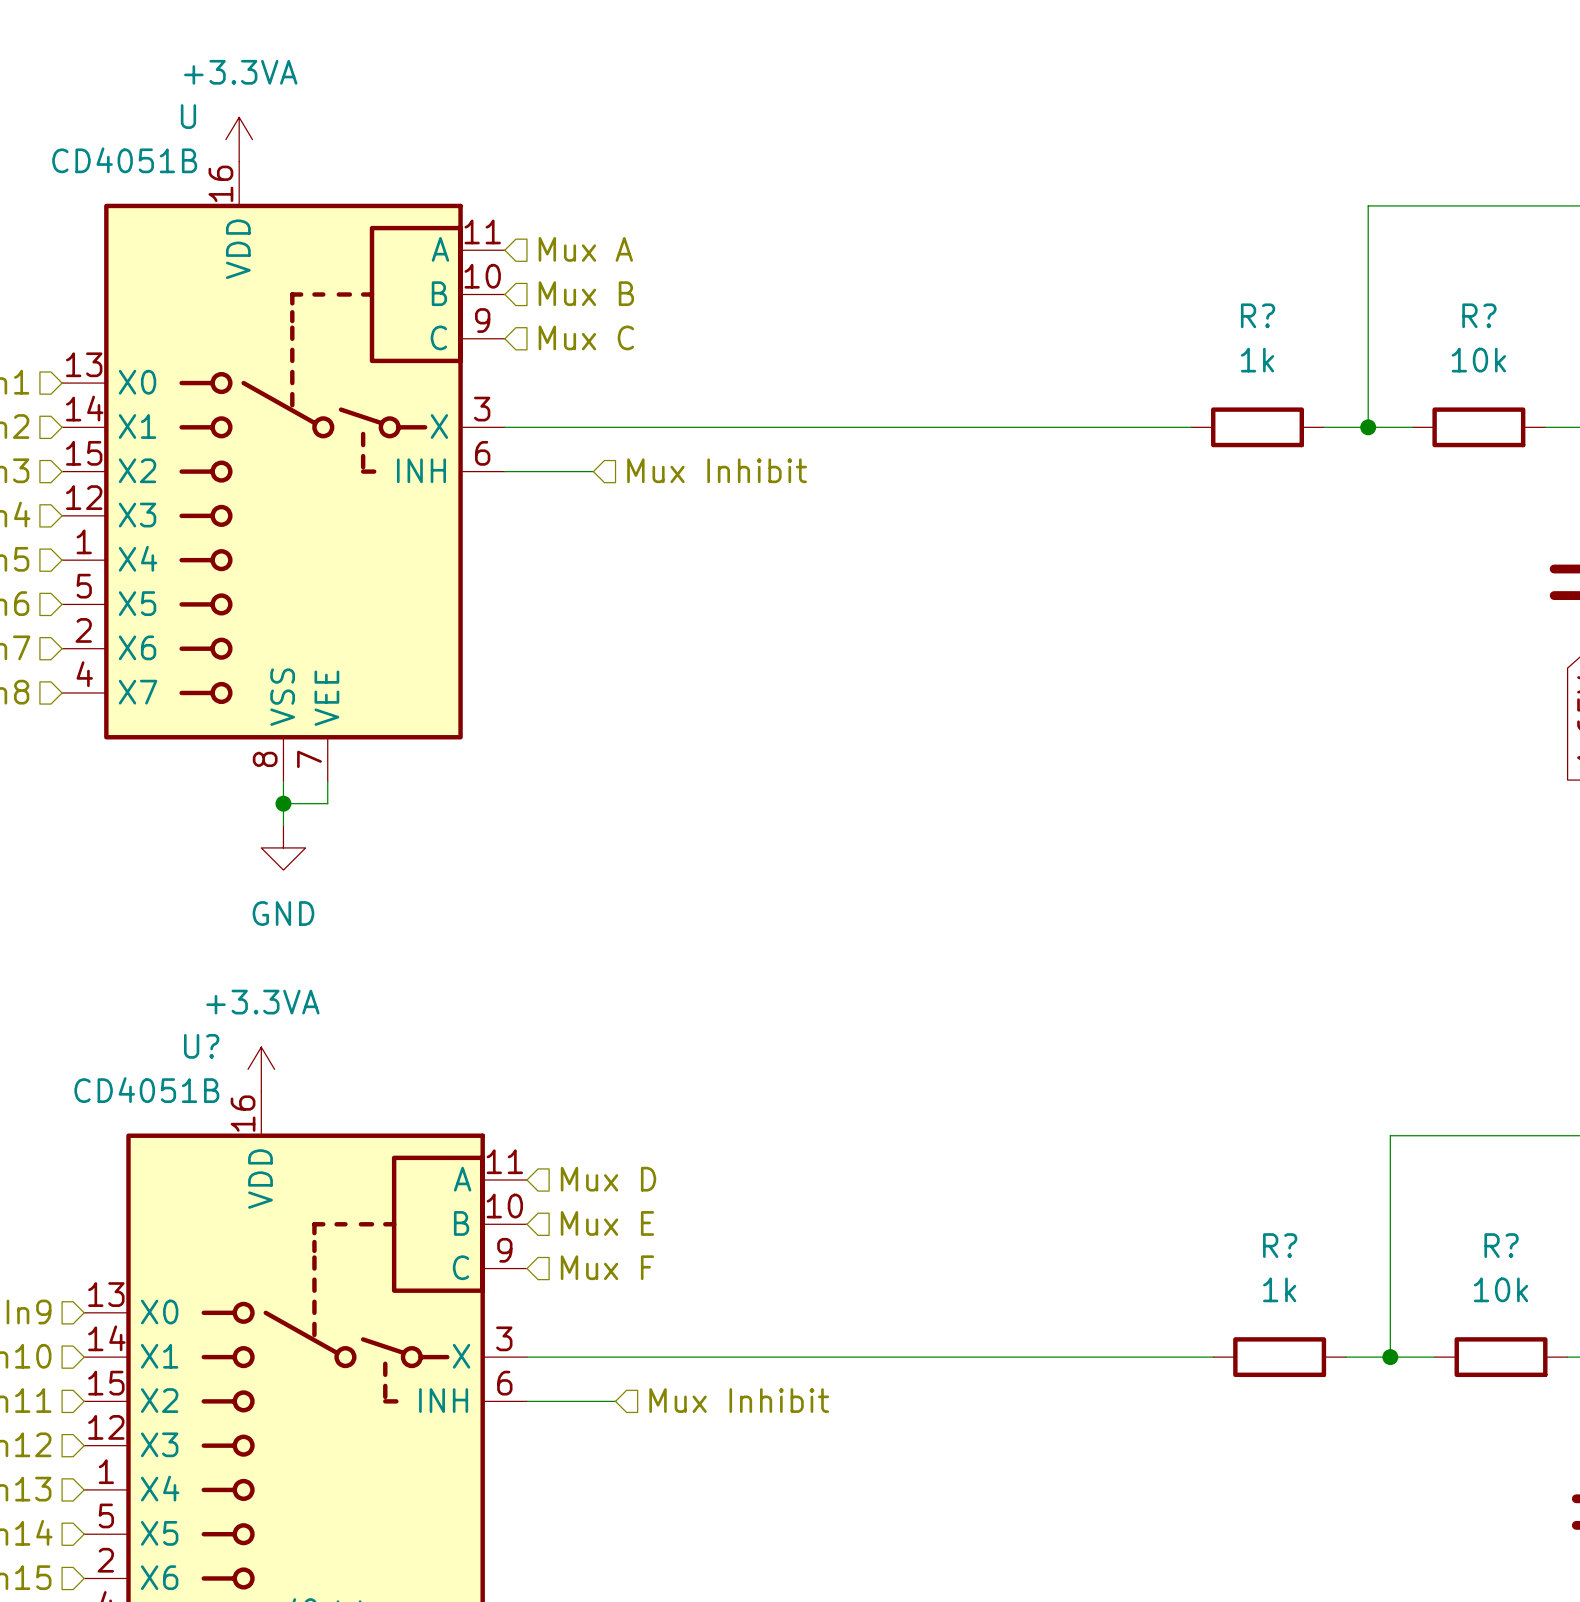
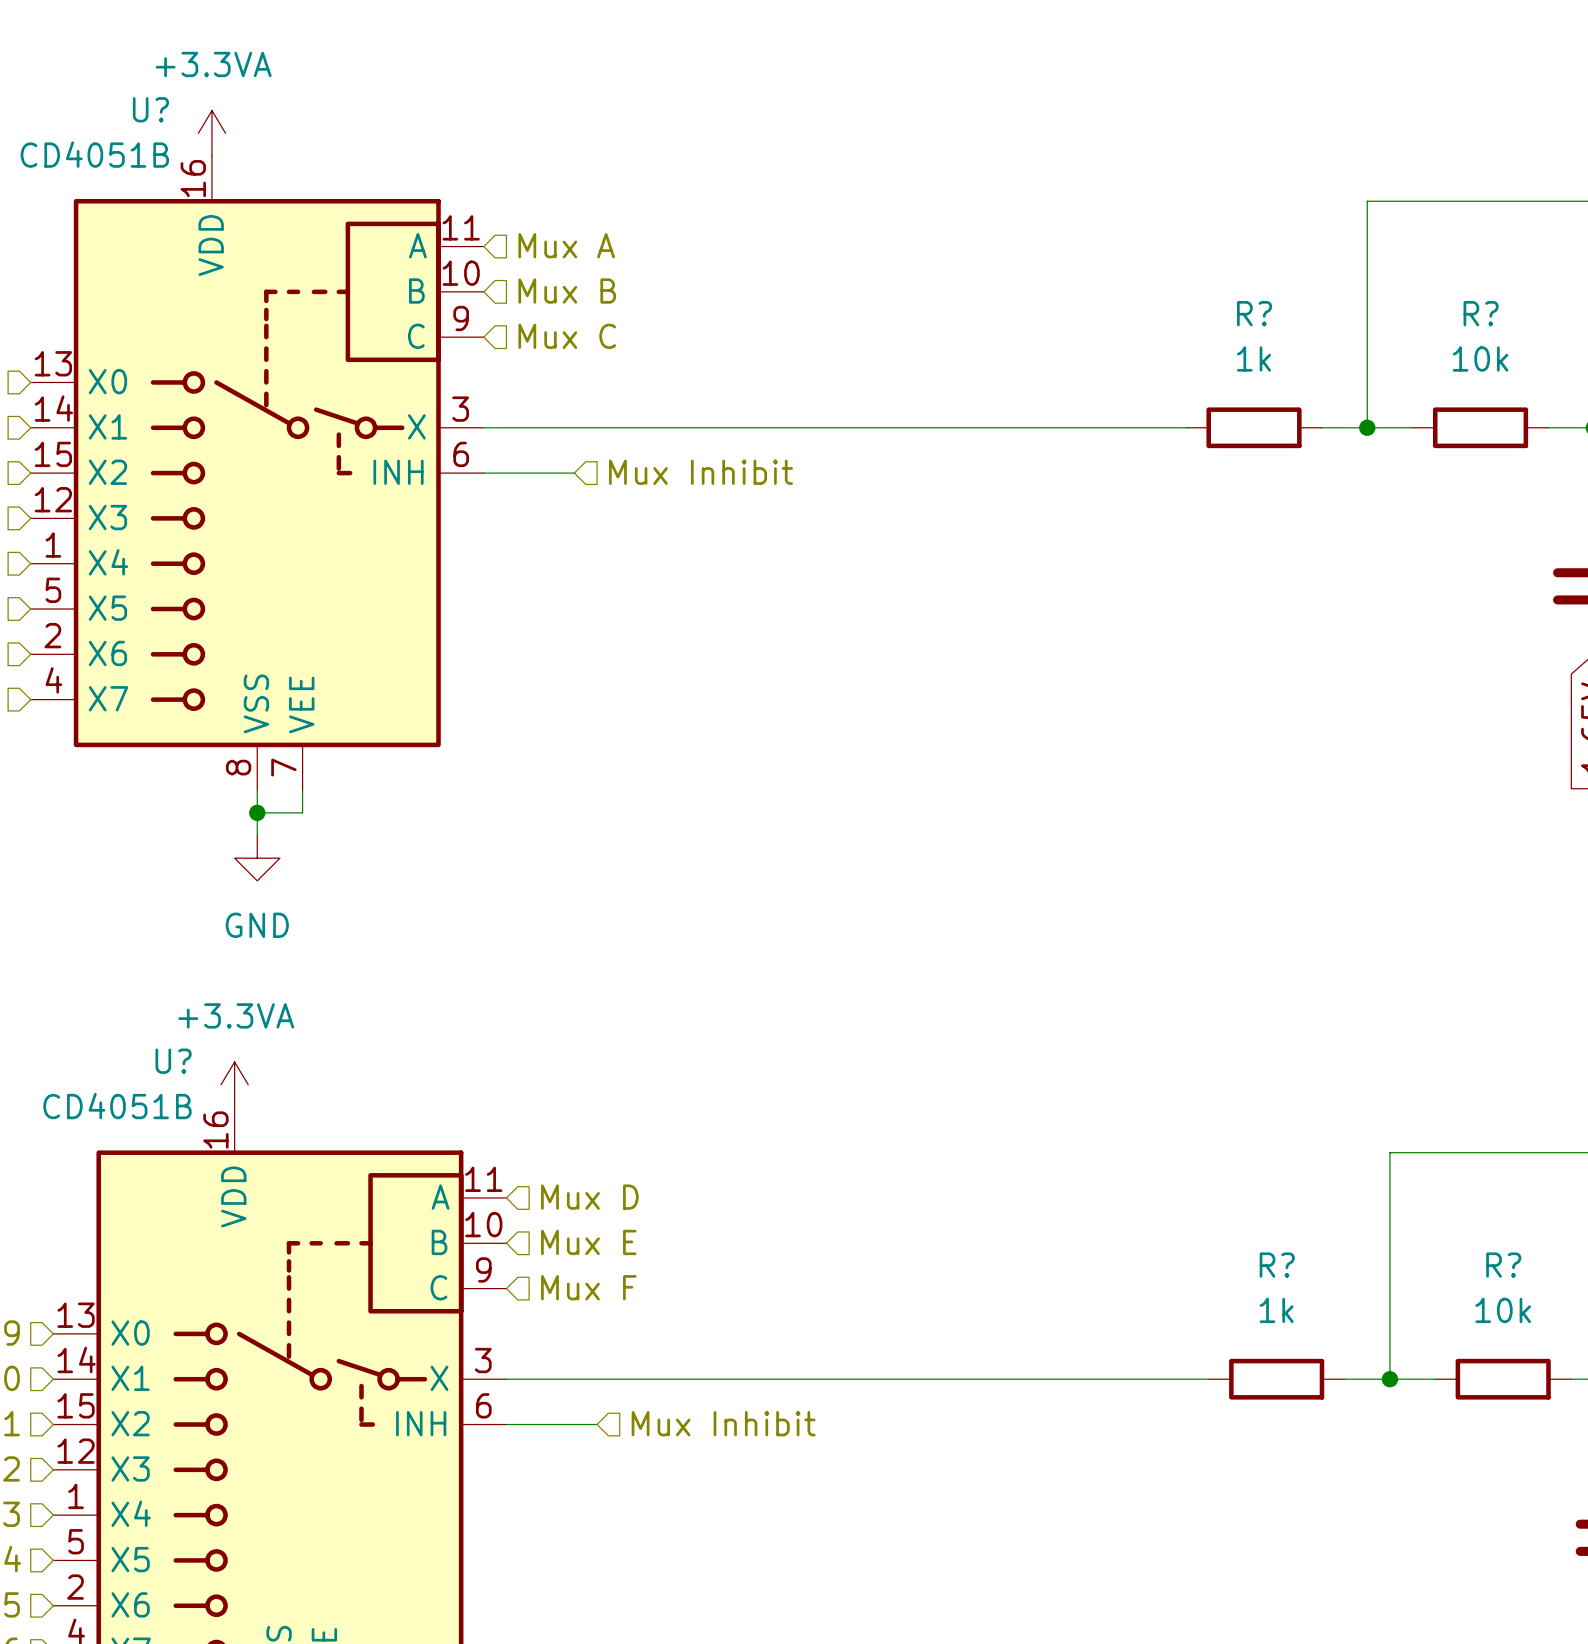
U name: U (188, 116) -> U? (150, 109)

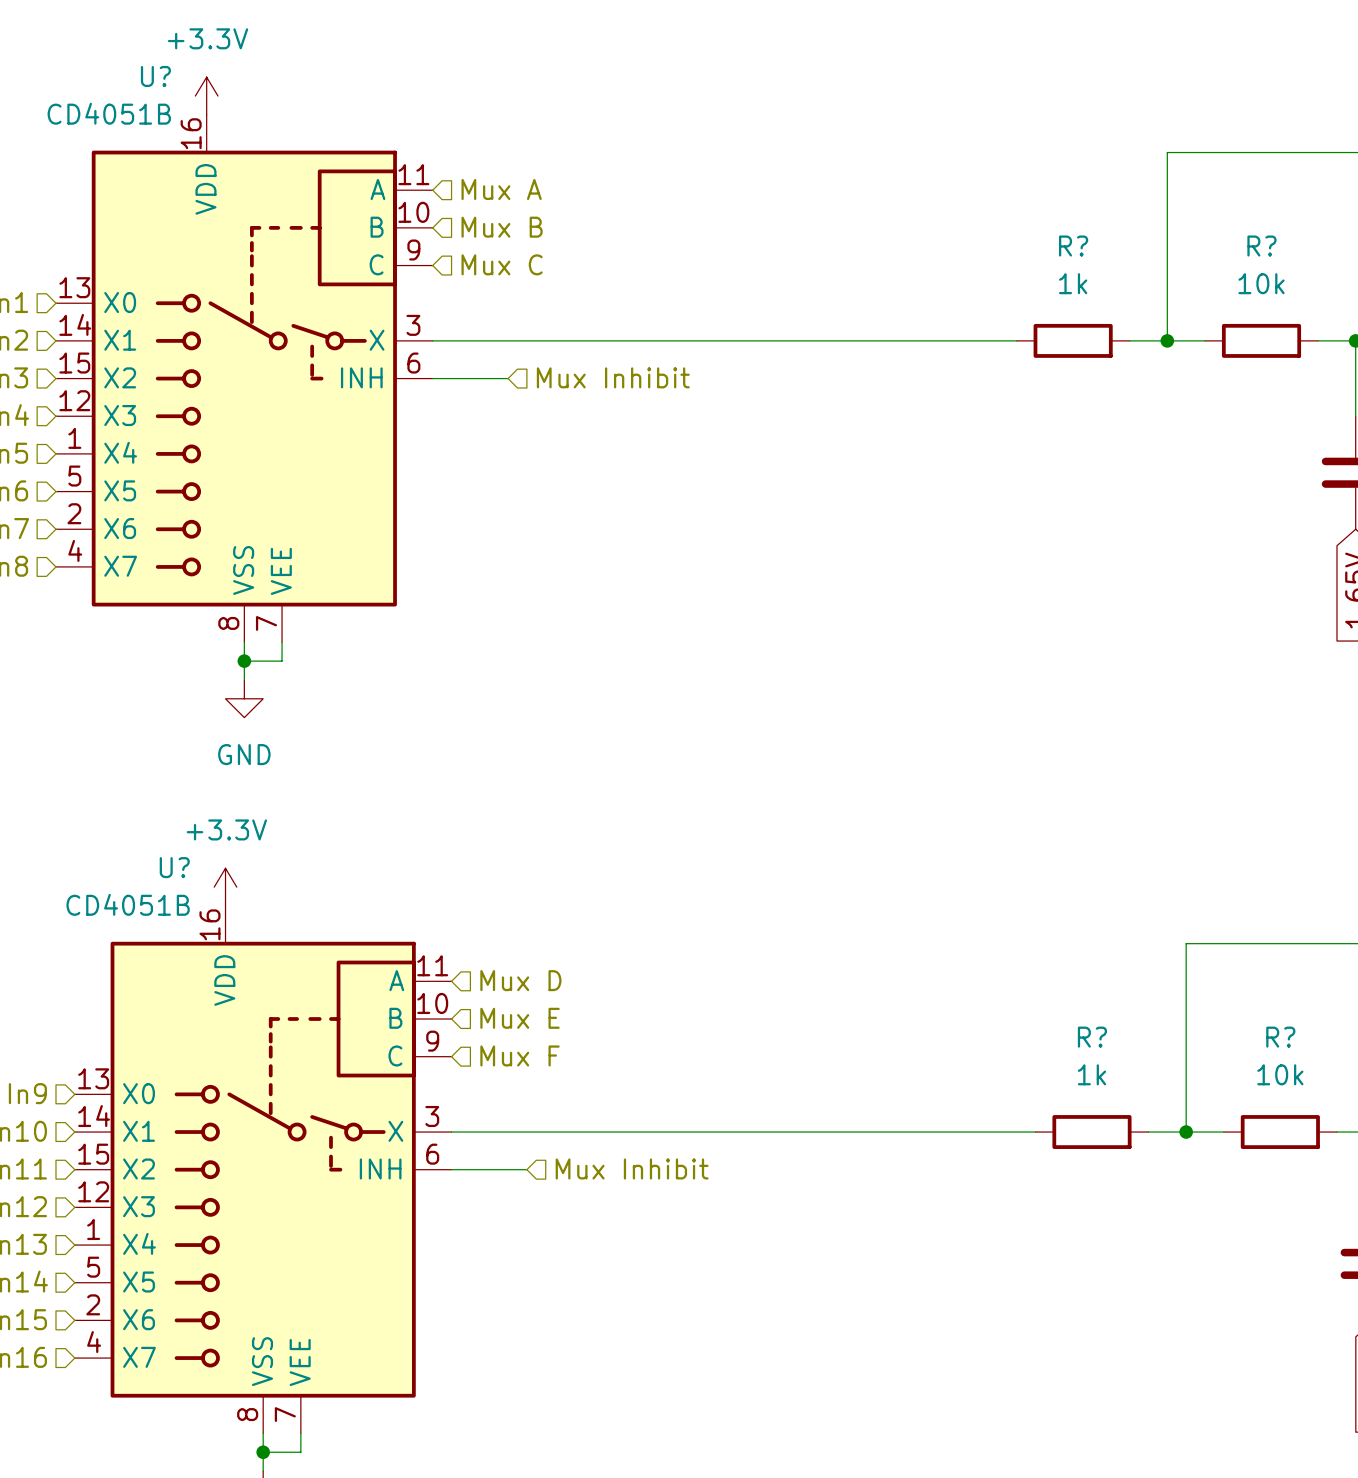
power symbol: +3.3VA (211, 133) -> +3.3V (206, 96)
power symbol: +3.3VA (234, 1084) -> +3.3V (225, 887)

